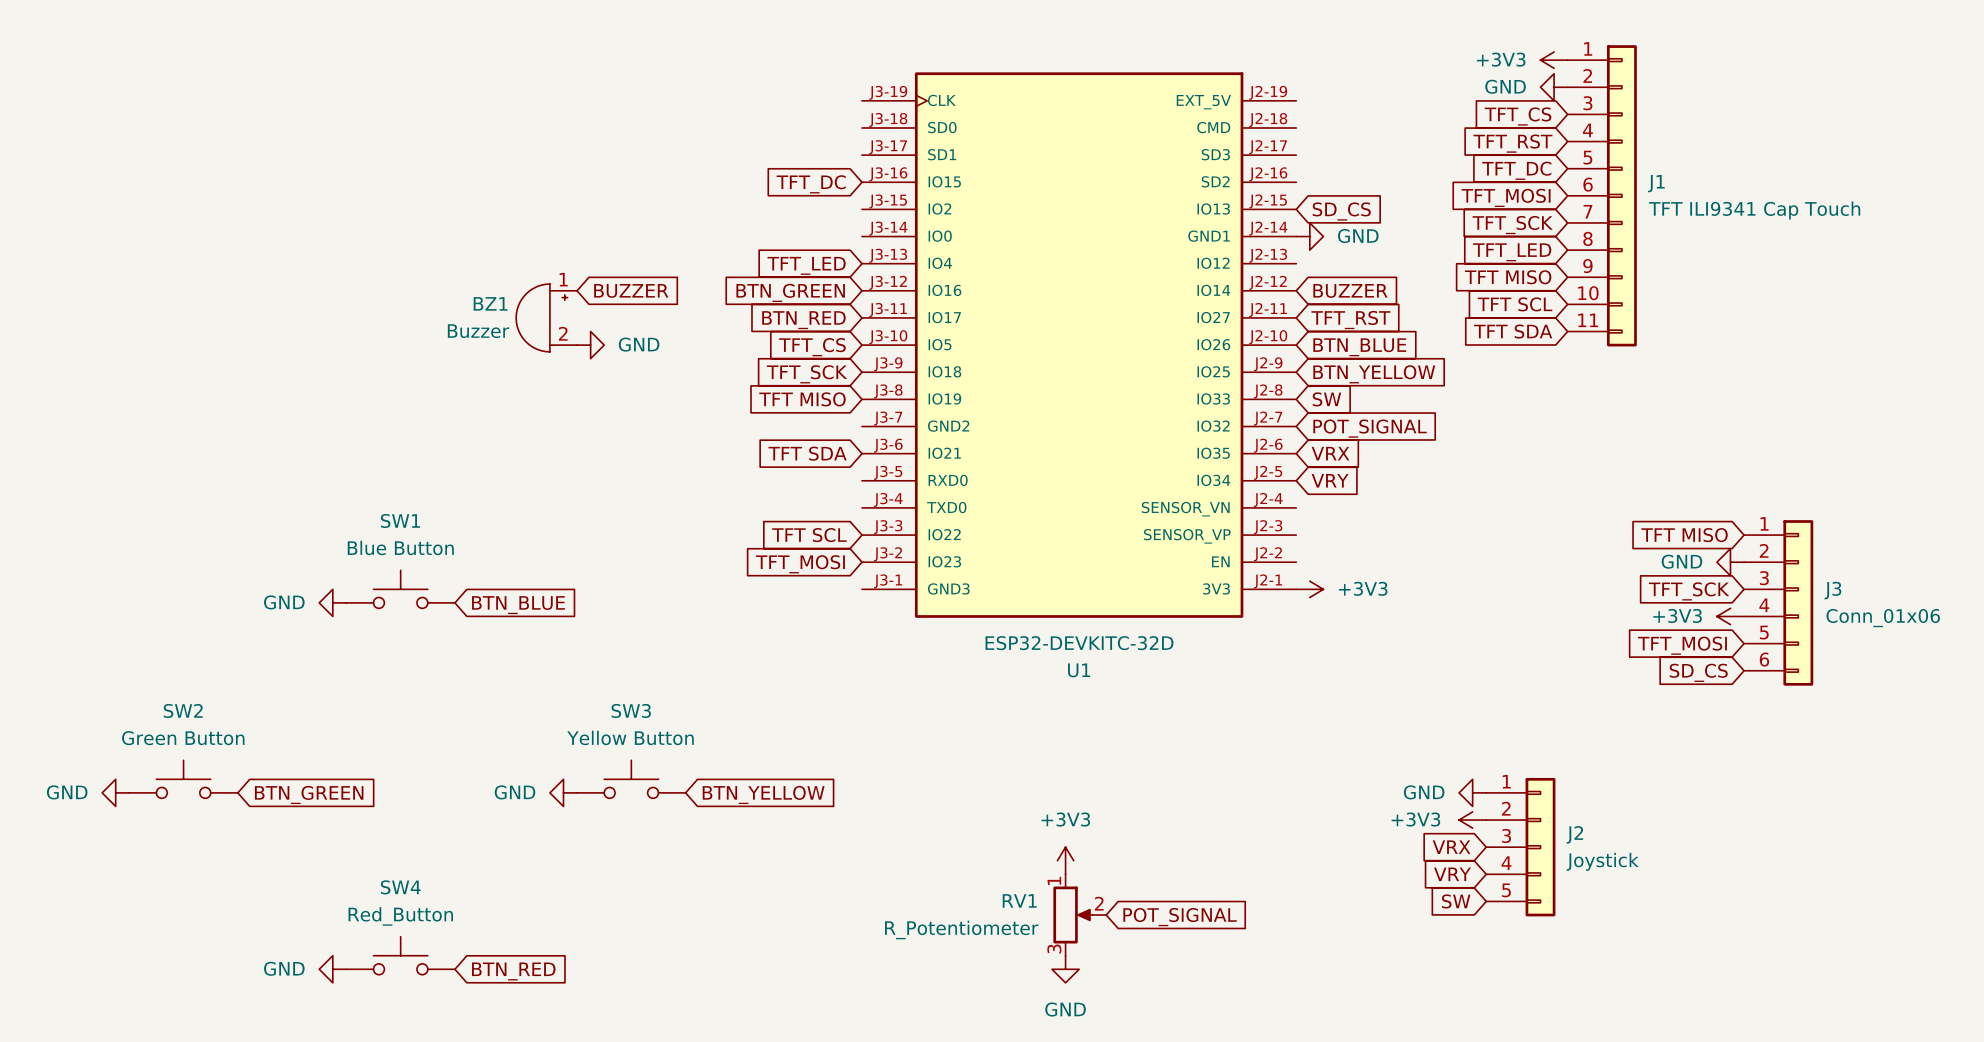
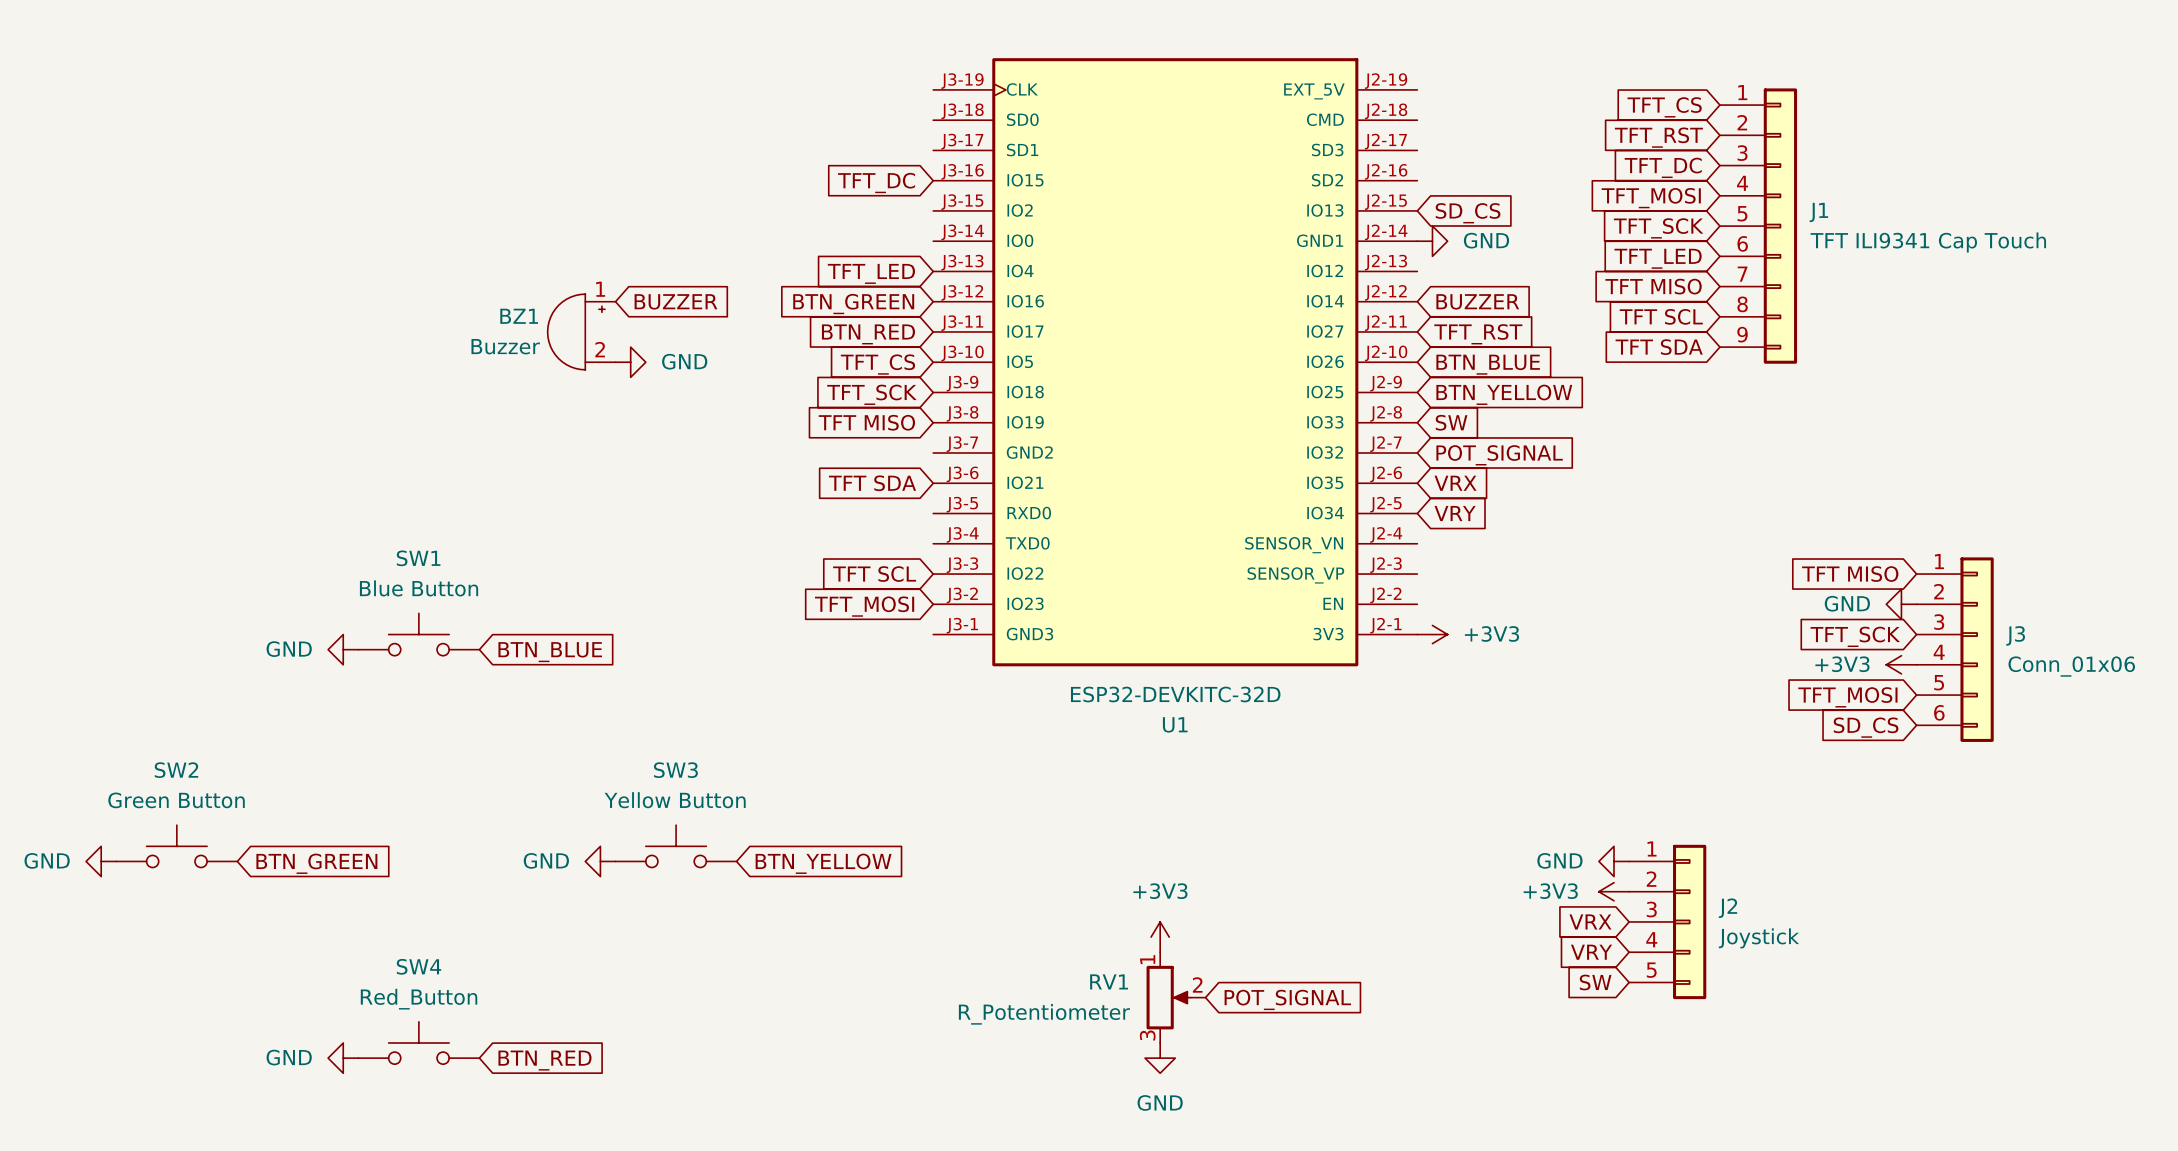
J1 symbol: [1567, 45, 1637, 347] -> [1719, 88, 1798, 364]
power symbol: +3V3 (1554, 60) -> none
power symbol: GND (1554, 87) -> none

